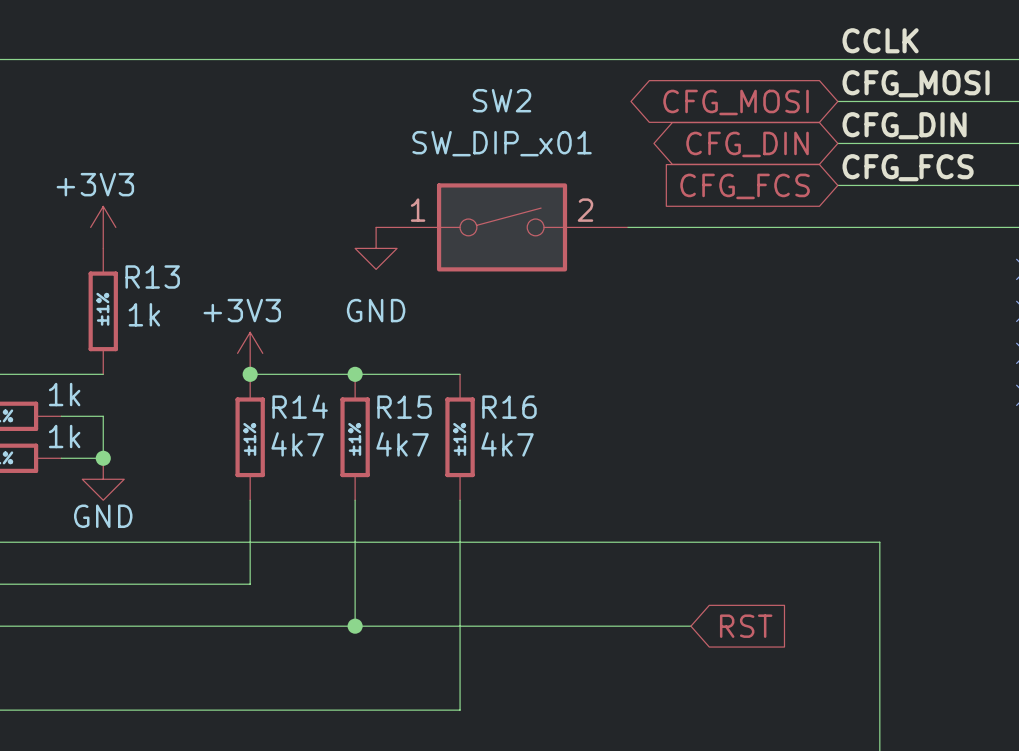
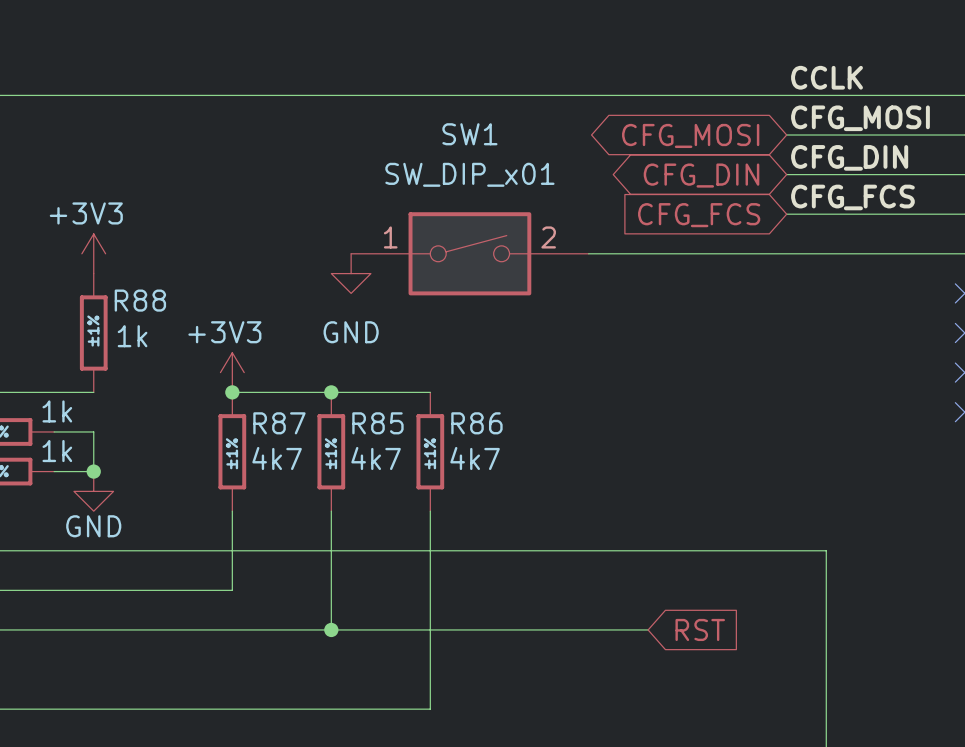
SW2 name: SW2 (502, 100) -> SW1 (469, 134)
R13 name: R13 (152, 277) -> R88 (140, 300)
R14 name: R14 (300, 406) -> R87 (279, 423)
R15 name: R15 (404, 407) -> R85 (377, 423)
R16 name: R16 (509, 407) -> R86 (476, 423)

